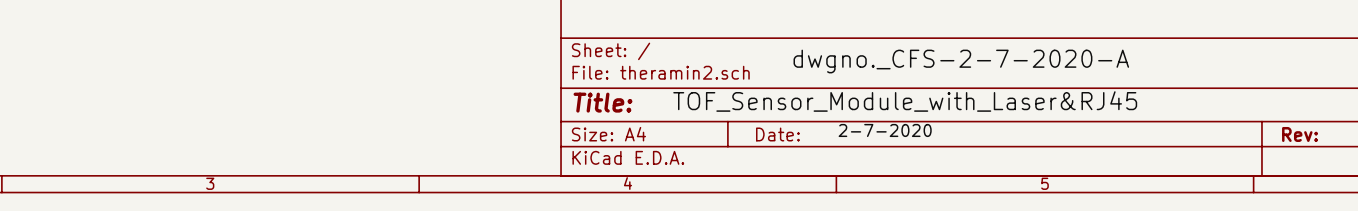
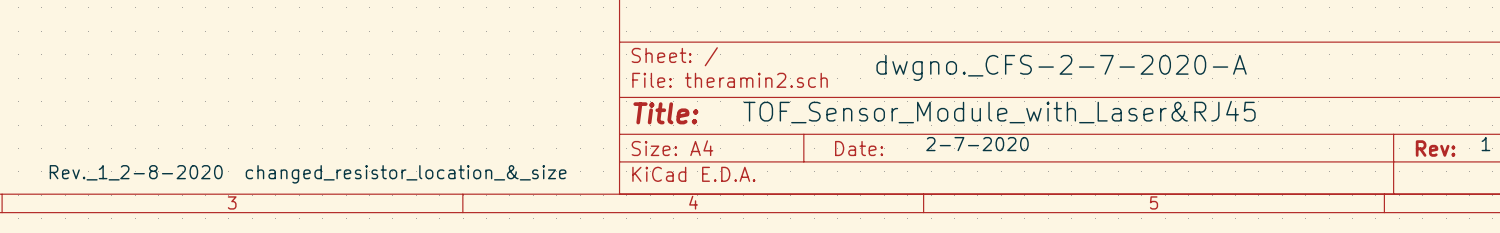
label: none -> 1 (1485, 144)
label: none -> Rev._1_2-8-2020 (136, 172)
label: none -> changed_resistor_location_&_size (406, 174)

